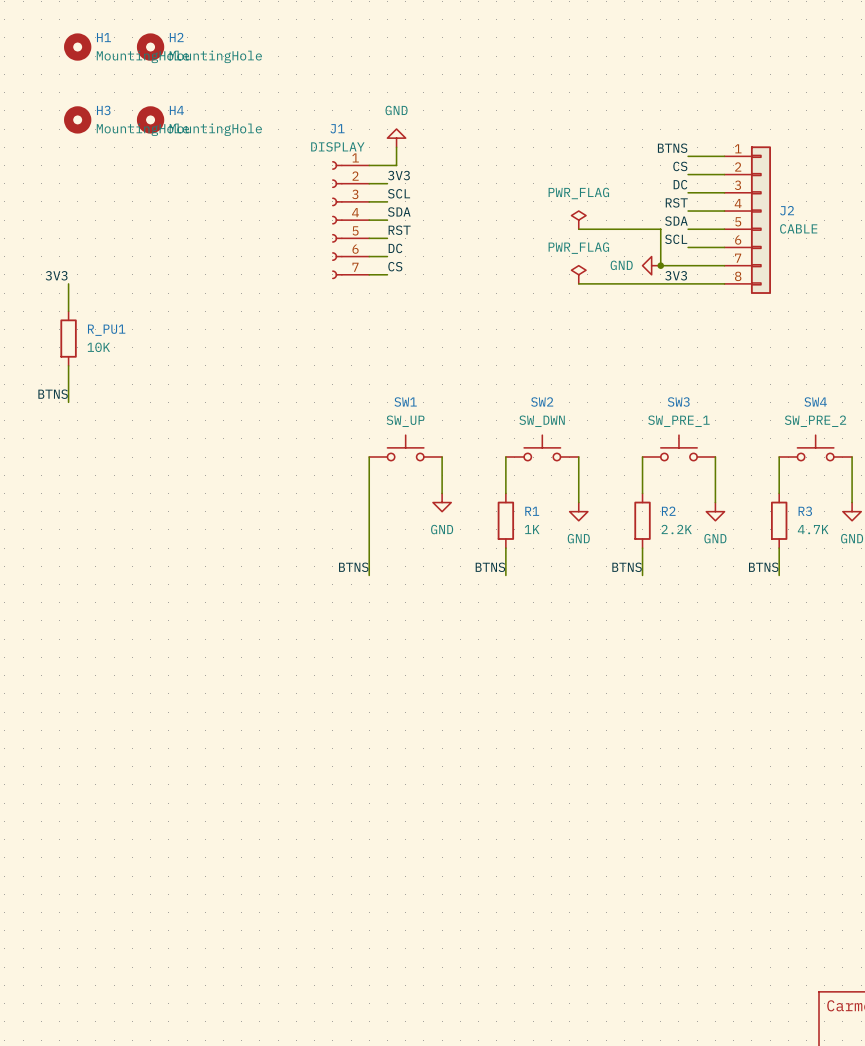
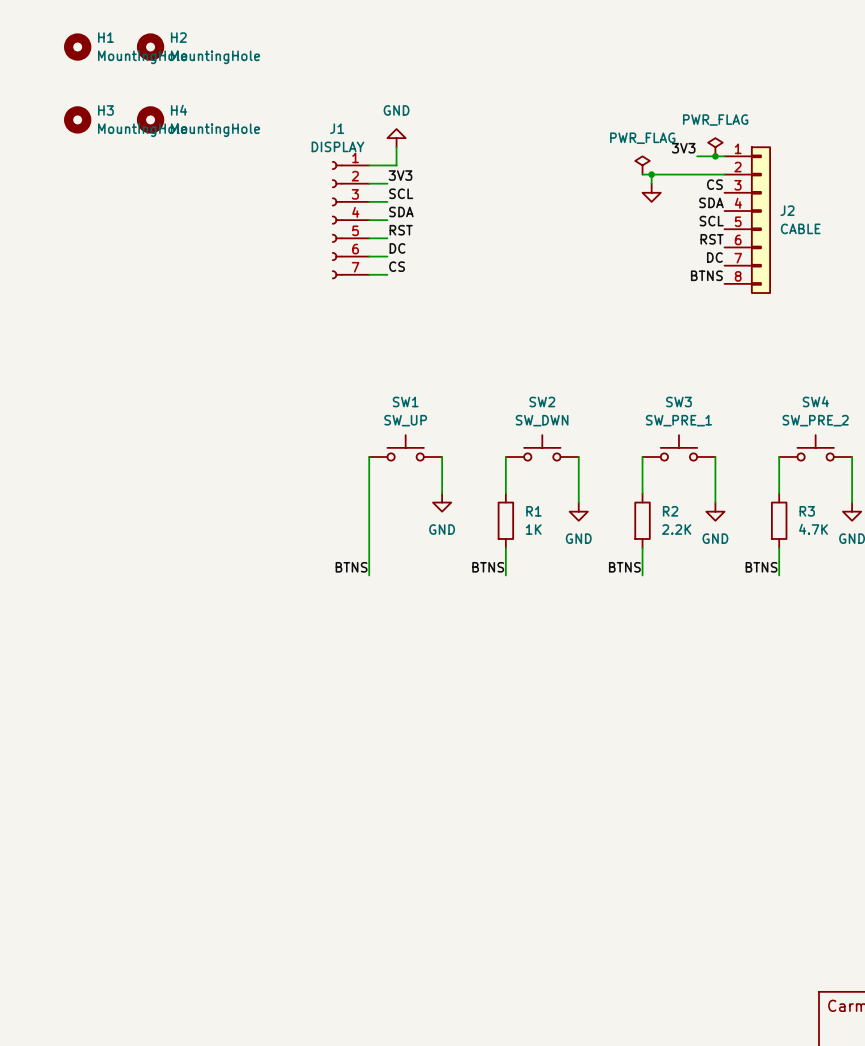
power symbol: none -> PWR_FLAG (715, 147)
label position: BTNS (672, 148) -> BTNS (706, 275)
wire: (688, 156) (697, 156) -> none
junction: none -> (715, 156)
power symbol: none -> PWR_FLAG (642, 165)
label position: CS (680, 166) -> CS (714, 184)
wire: none -> (642, 174) (688, 174)
wire: none -> (651, 174) (651, 183)
junction: none -> (651, 174)
label position: DC (680, 184) -> DC (714, 257)
power symbol: none -> (651, 192)
wire: (688, 192) (724, 192) -> none
label position: RST (676, 202) -> RST (712, 239)
wire: (688, 211) (724, 211) -> none
power symbol: PWR_FLAG (578, 220) -> none
label position: SDA (676, 221) -> SDA (711, 202)
wire: (578, 229) (660, 229) (660, 265) (724, 265) -> none
wire: (688, 229) (724, 229) -> none
label position: SCL (676, 239) -> SCL (711, 221)
wire: (688, 247) (724, 247) -> none
power symbol: GND (651, 265) -> none
junction: (660, 265) -> none
power symbol: PWR_FLAG (578, 274) -> none
label: 3V3 (56, 275) -> none
label position: 3V3 (676, 275) -> 3V3 (683, 148)
wire: (68, 283) (68, 311) -> none
wire: (578, 283) (724, 283) -> none
R_PU1: 10K (68, 338) -> none
wire: (68, 365) (68, 402) -> none
label: BTNS (53, 394) -> none

